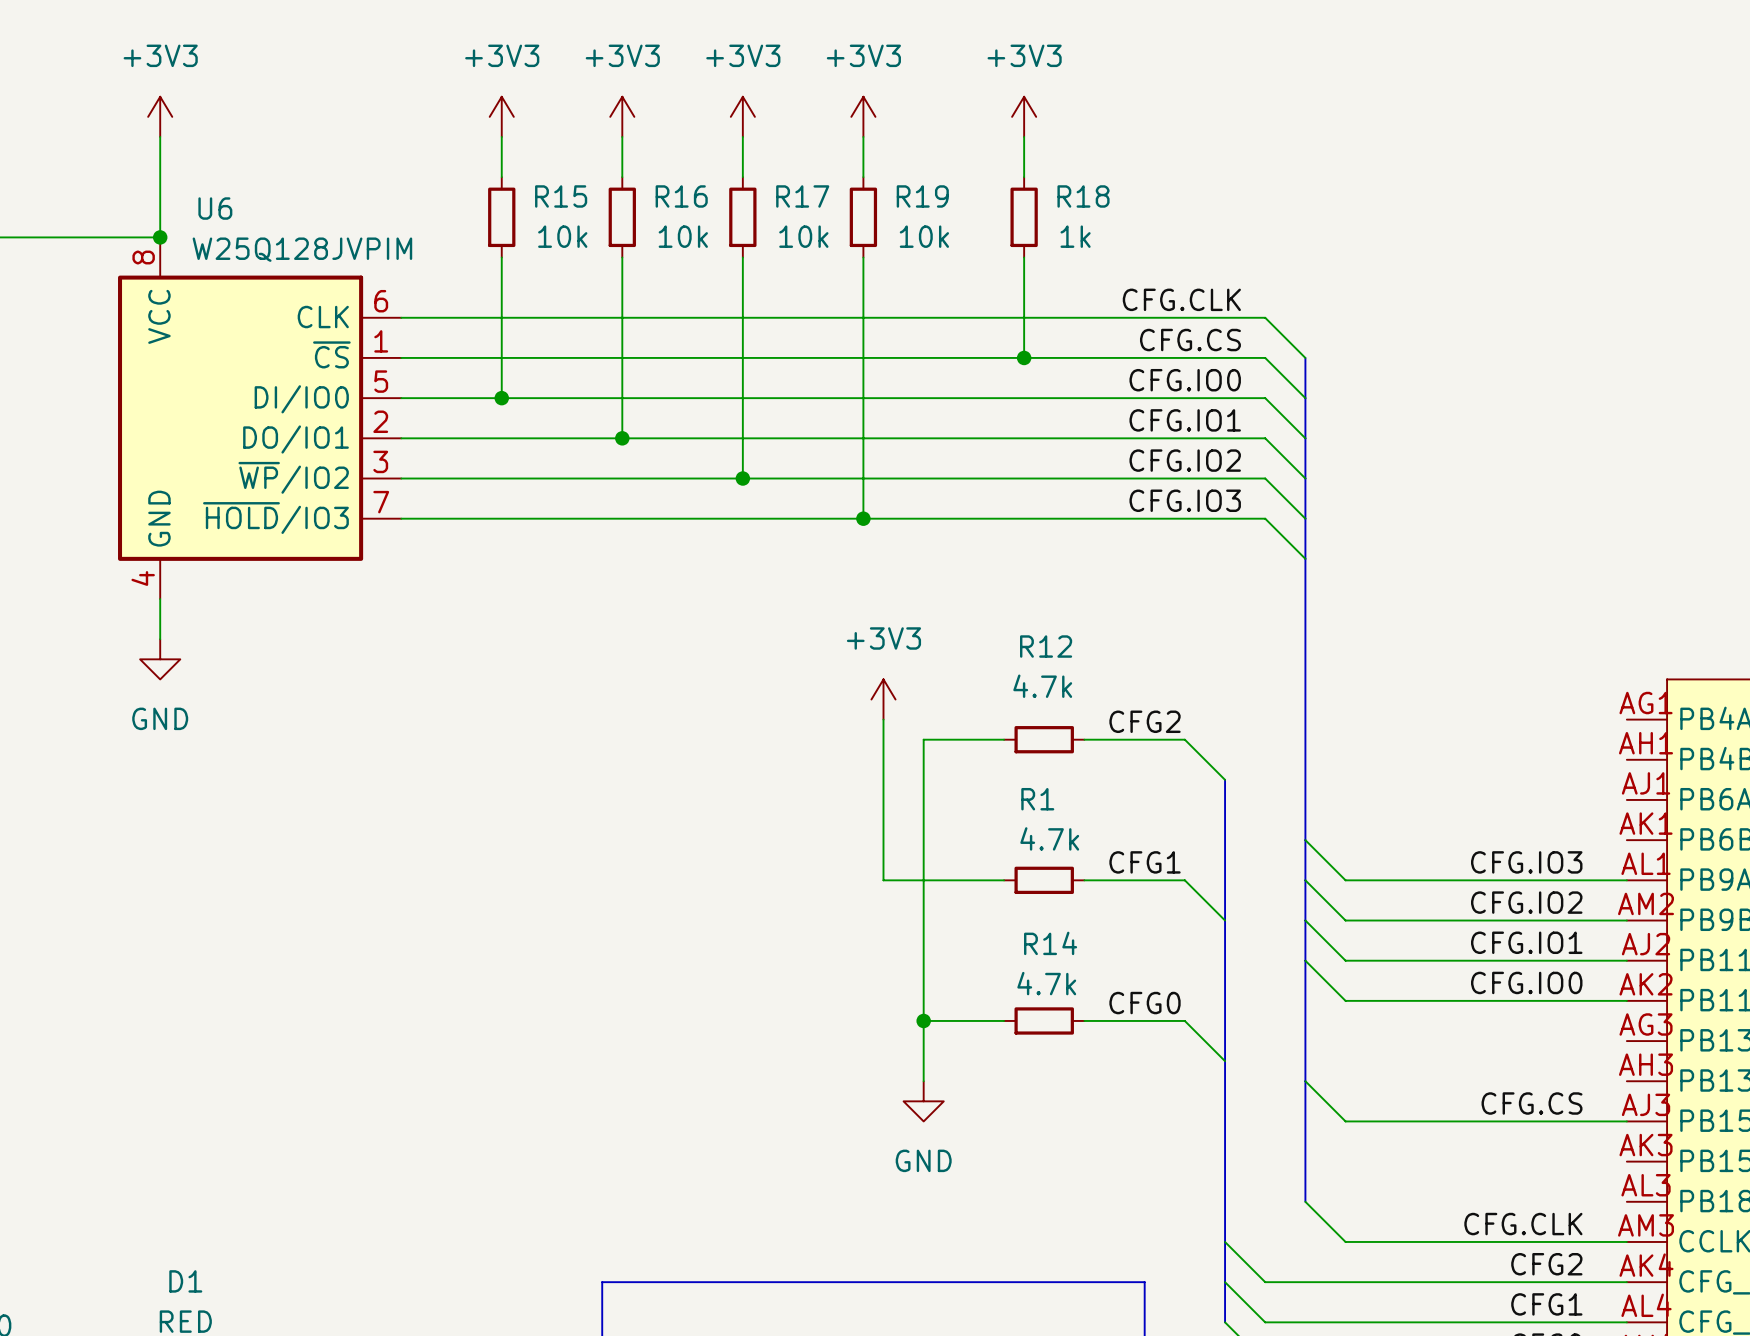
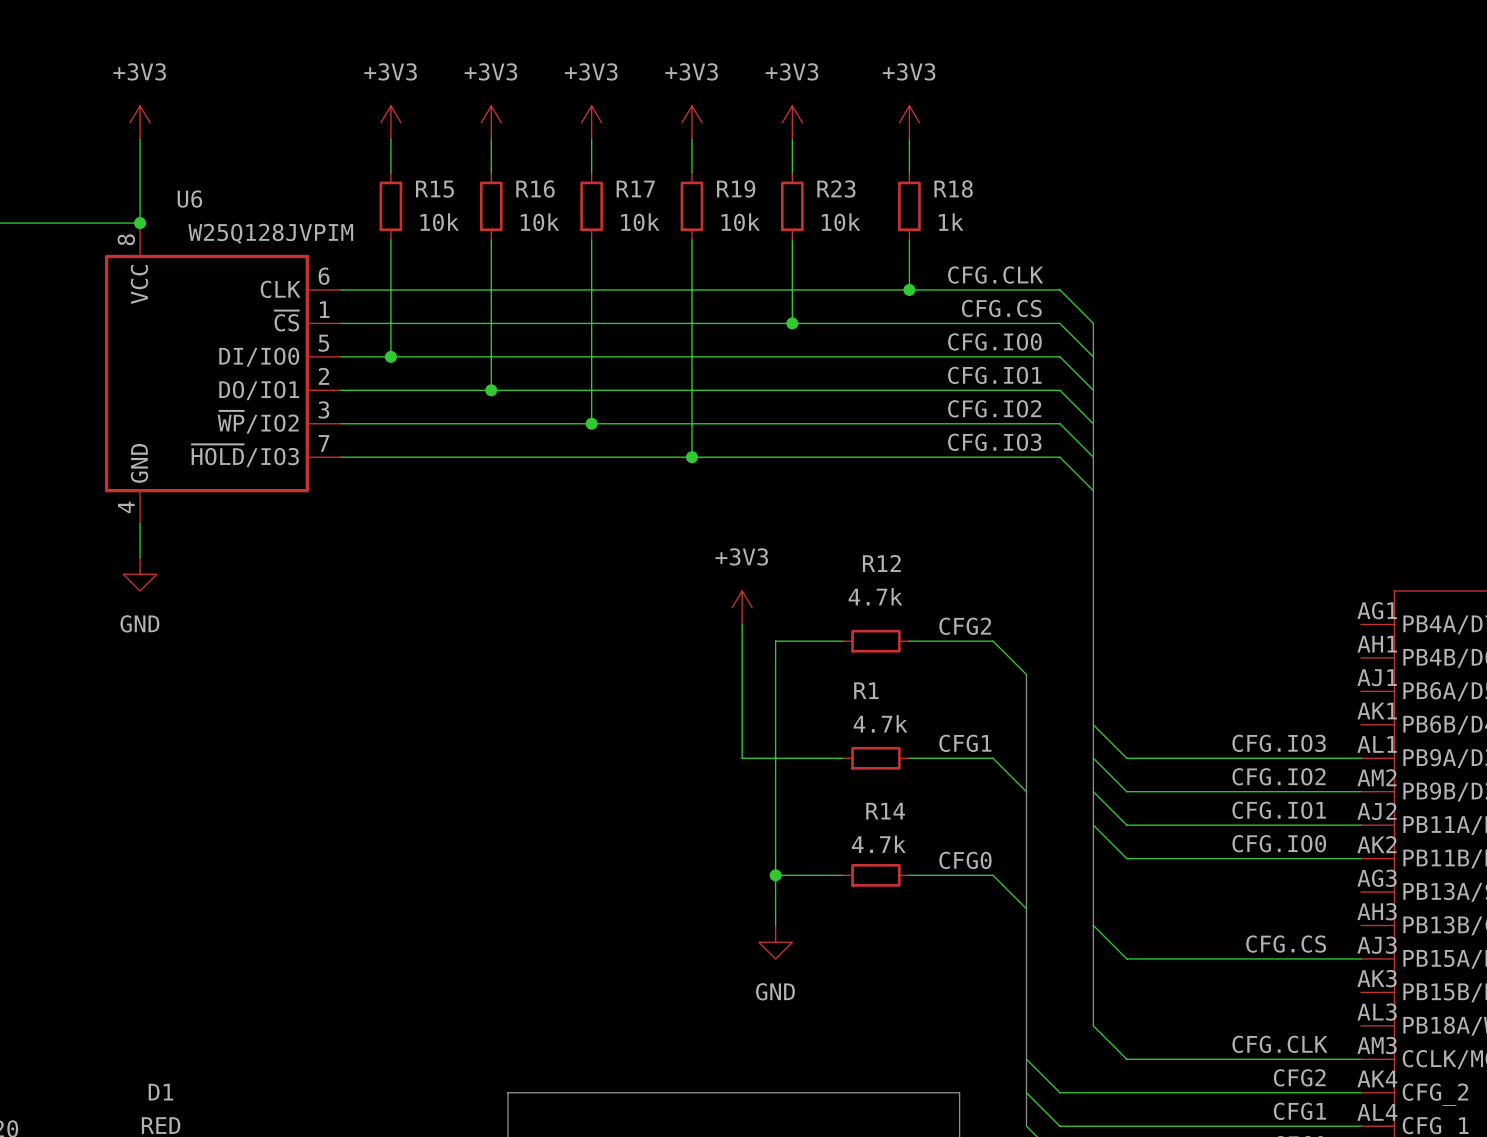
power symbol: none -> +3V3 (390, 122)
power symbol: +3V3 (501, 116) -> none
power symbol: none -> +3V3 (491, 122)
power symbol: +3V3 (622, 116) -> none
power symbol: none -> +3V3 (591, 122)
power symbol: +3V3 (742, 116) -> none
power symbol: none -> +3V3 (691, 122)
power symbol: +3V3 (863, 116) -> none
power symbol: none -> +3V3 (792, 122)
power symbol: +3V3 (1024, 116) -> none
power symbol: none -> +3V3 (909, 122)
wire: (501, 136) (501, 177) -> (390, 139) (390, 172)
wire: (622, 136) (622, 177) -> (491, 139) (491, 172)
wire: (742, 136) (742, 177) -> (591, 139) (591, 172)
wire: (863, 136) (863, 177) -> (691, 139) (691, 172)
wire: (1024, 136) (1024, 177) -> (792, 139) (792, 172)
wire: none -> (909, 139) (909, 172)
R15 position: (501, 217) -> (390, 206)
R16 position: (622, 217) -> (491, 206)
R17 position: (742, 217) -> (591, 206)
R19 position: (863, 217) -> (691, 206)
R23: none -> 10k (792, 206)
R18 position: (1024, 217) -> (909, 206)
wire: (501, 257) (501, 398) -> (390, 239) (390, 356)
wire: (622, 257) (622, 438) -> (491, 239) (491, 390)
wire: (742, 257) (742, 478) -> (591, 239) (591, 423)
wire: (863, 257) (863, 518) -> (691, 239) (691, 457)
wire: (1024, 257) (1024, 357) -> (792, 239) (792, 323)
wire: none -> (909, 239) (909, 289)
junction: none -> (909, 289)
junction: none -> (792, 323)
junction: (1024, 357) -> none
junction position: (501, 398) -> (390, 356)
junction position: (622, 438) -> (491, 390)
junction position: (742, 478) -> (591, 423)
junction position: (863, 518) -> (691, 457)

